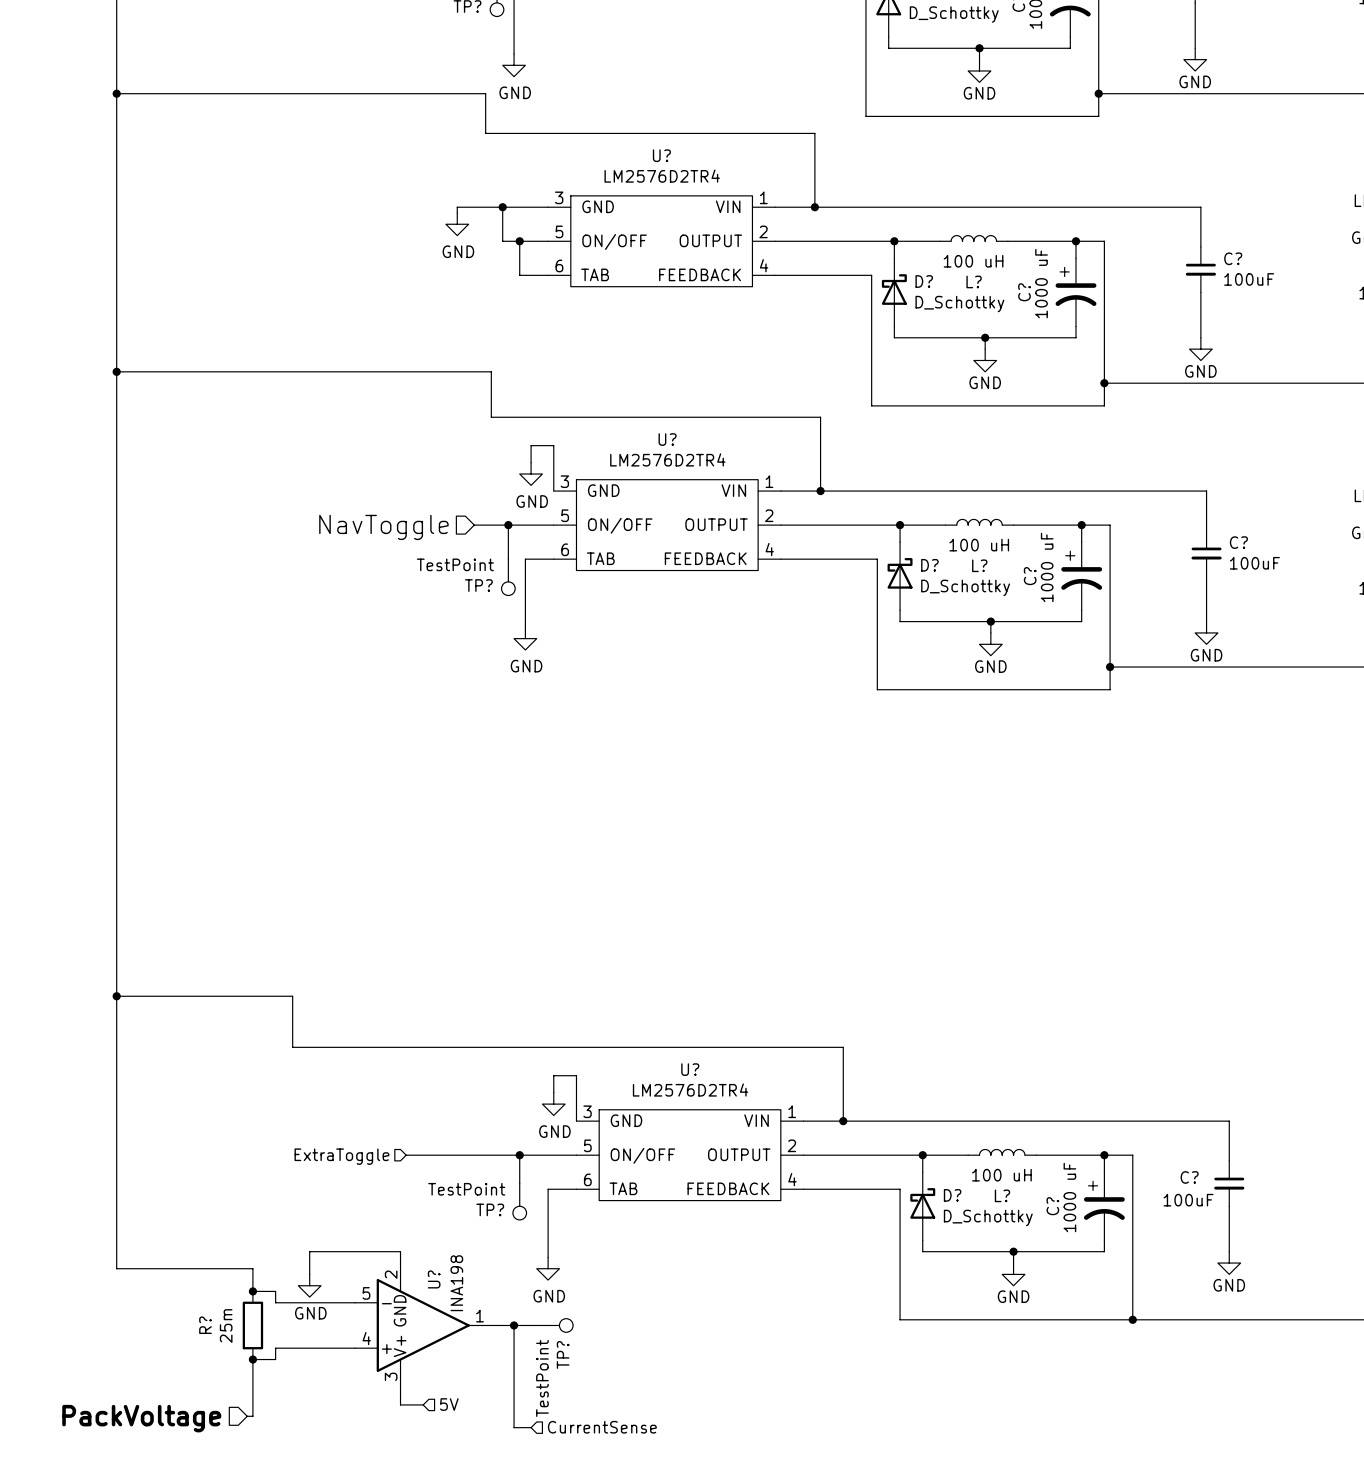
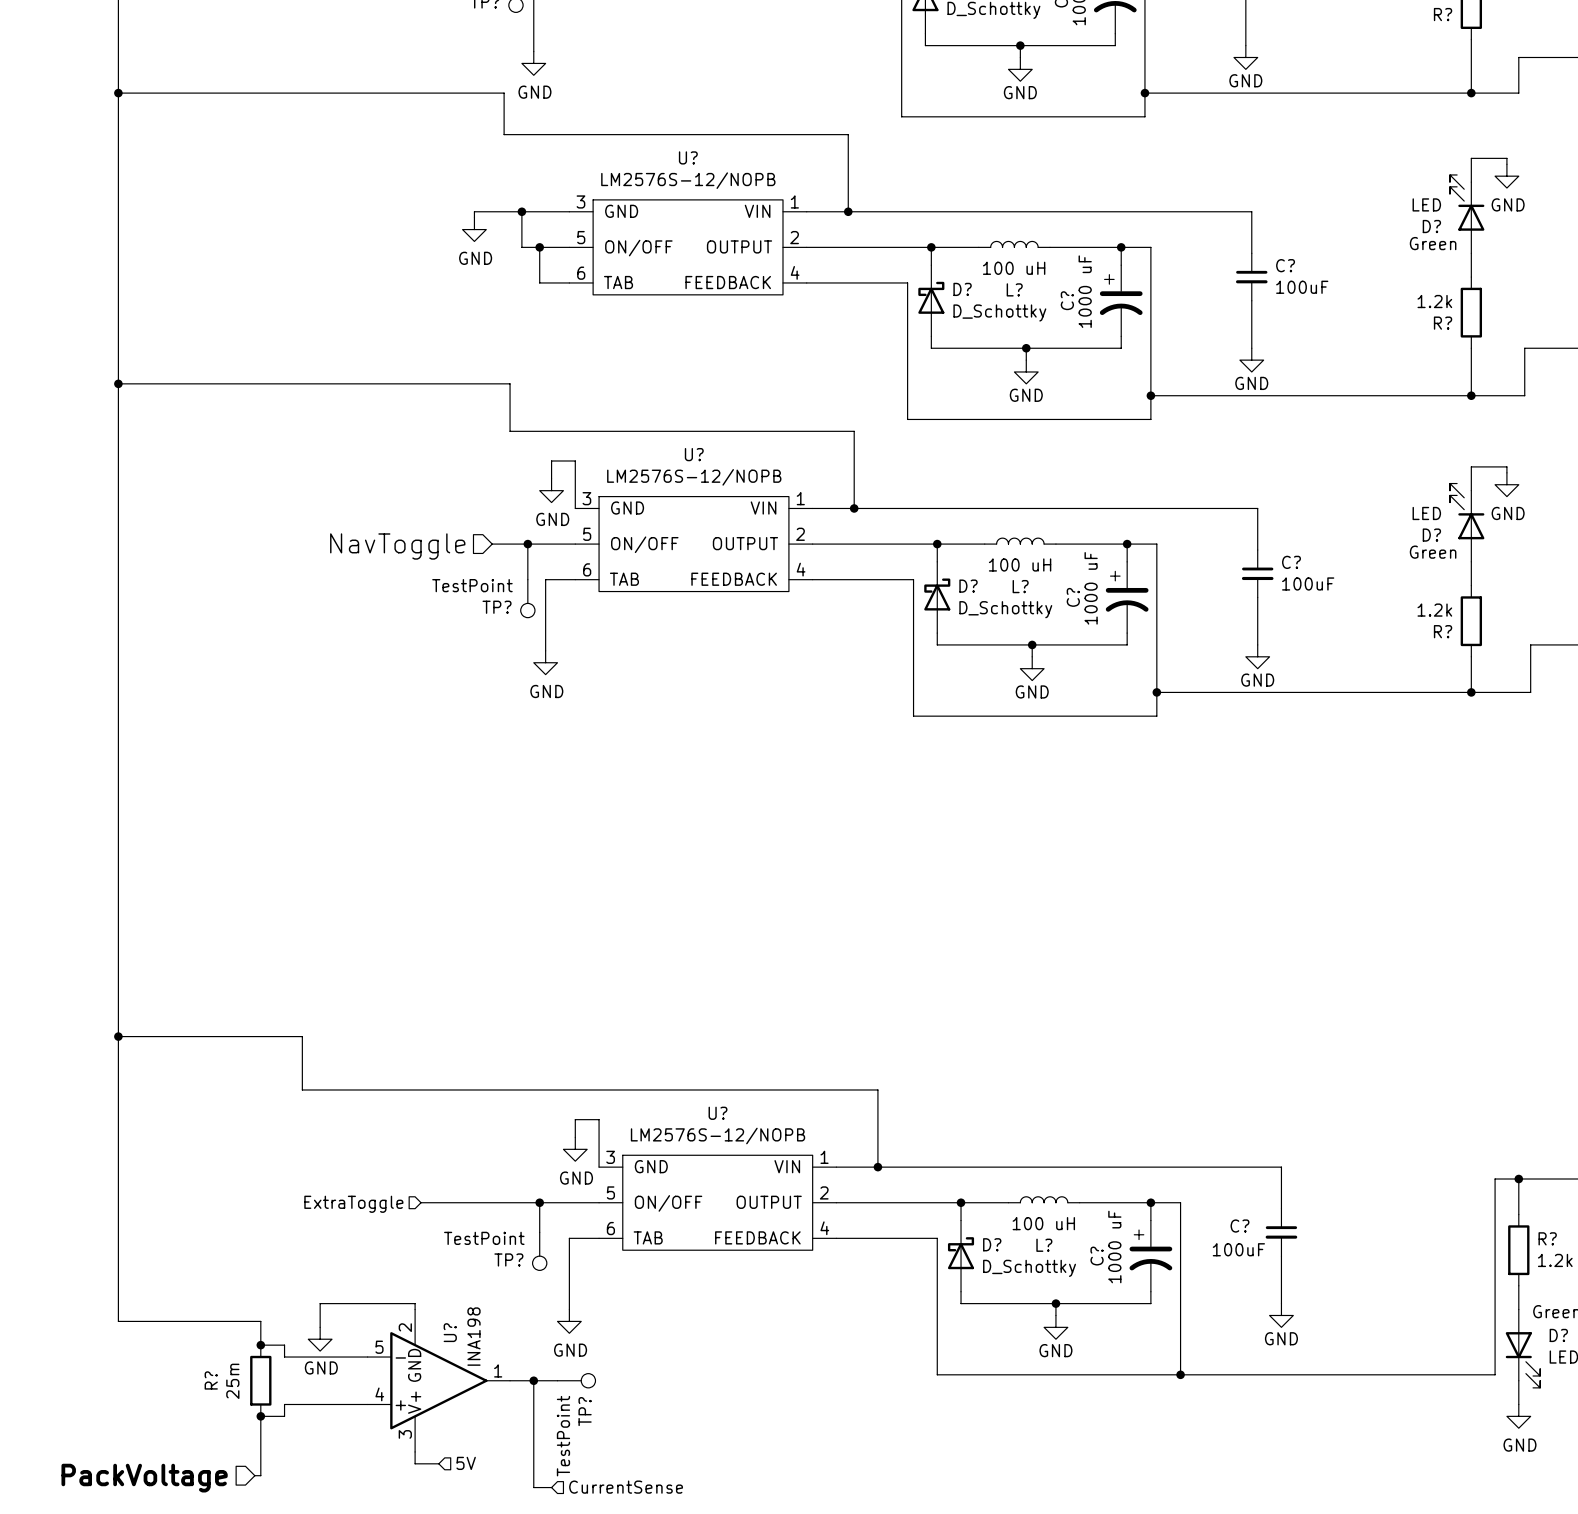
U? value: LM2576D2TR4 (662, 176) -> LM2576S-12/NOPB (688, 180)
U? value: LM2576D2TR4 (667, 459) -> LM2576S-12/NOPB (694, 477)
U? value: LM2576D2TR4 (690, 1090) -> LM2576S-12/NOPB (718, 1136)

